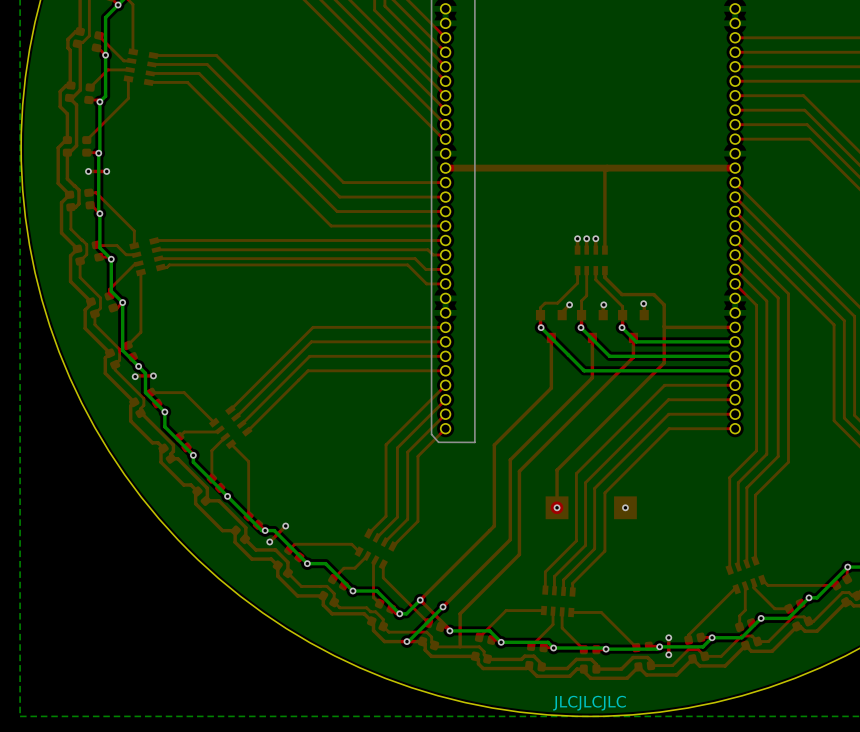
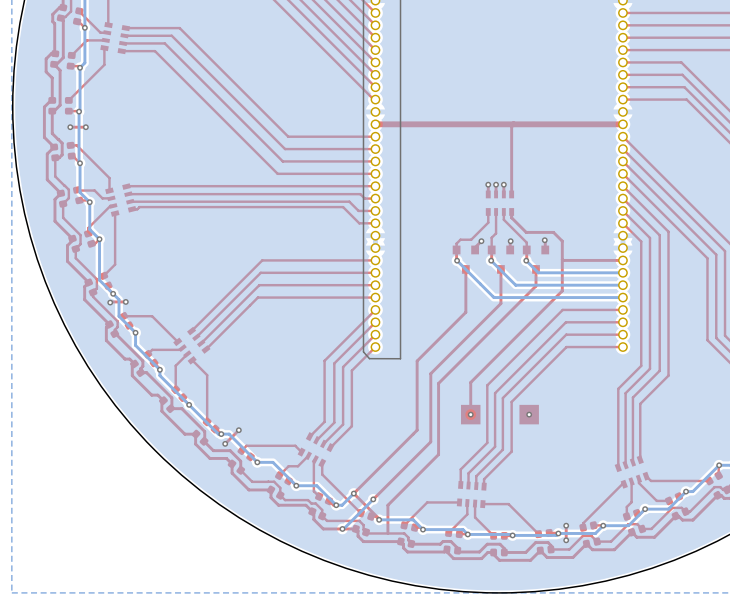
text: JLCJLCJLC (589, 703) -> none

